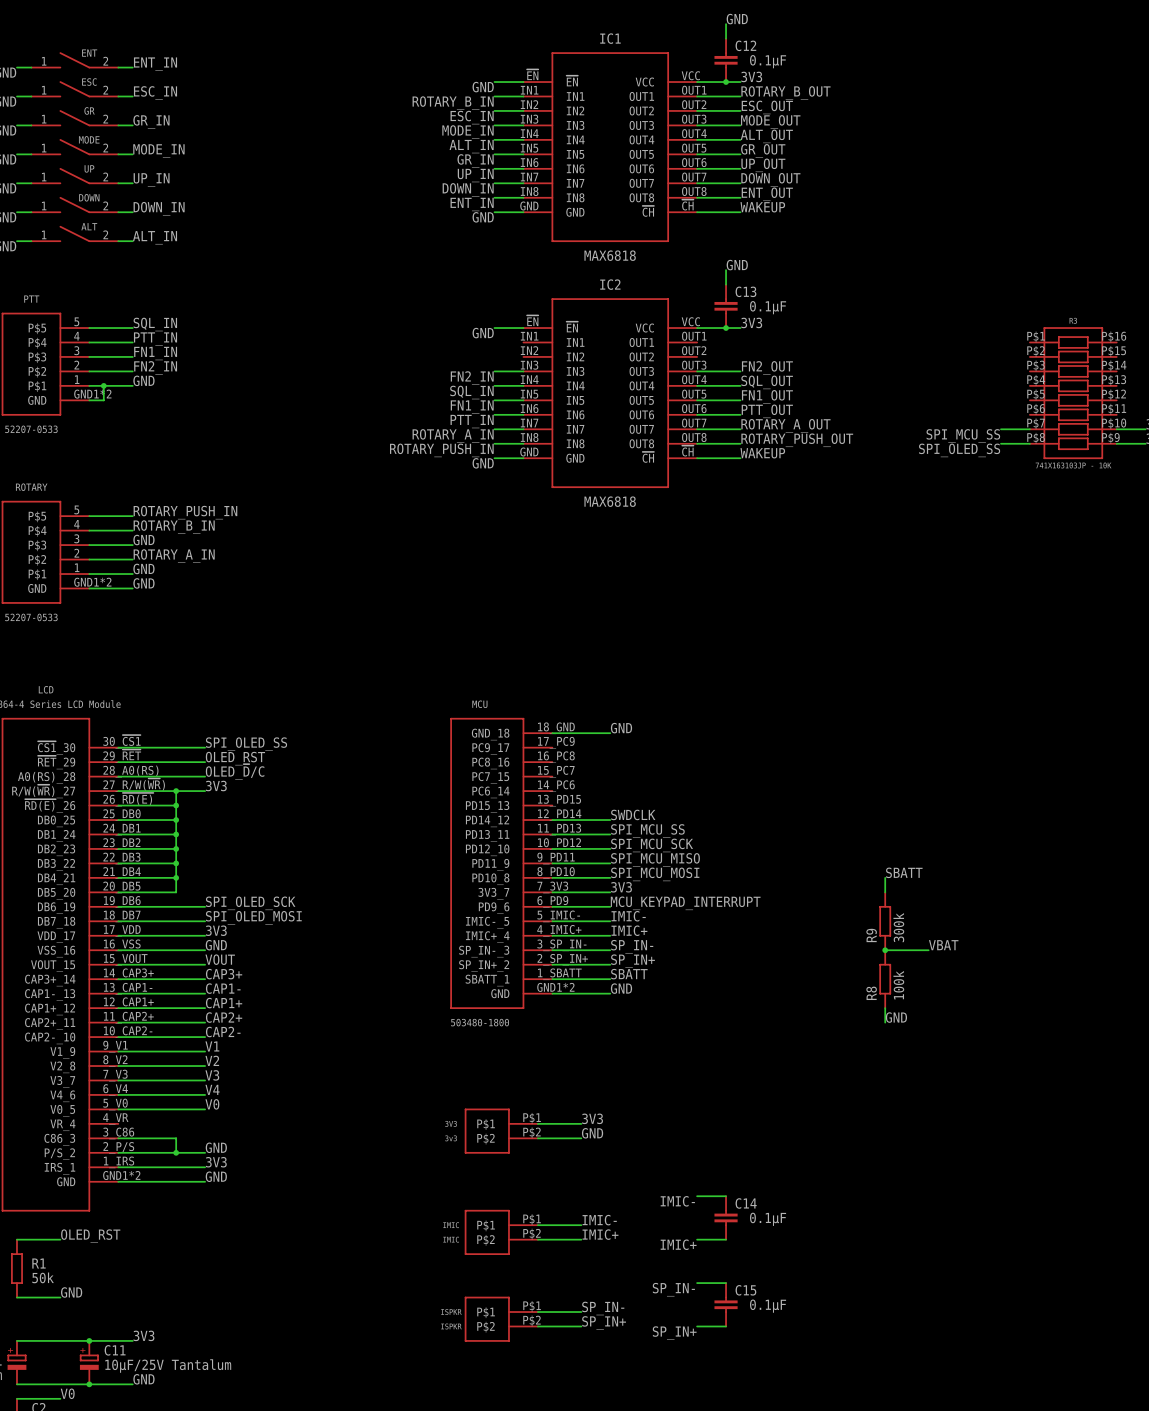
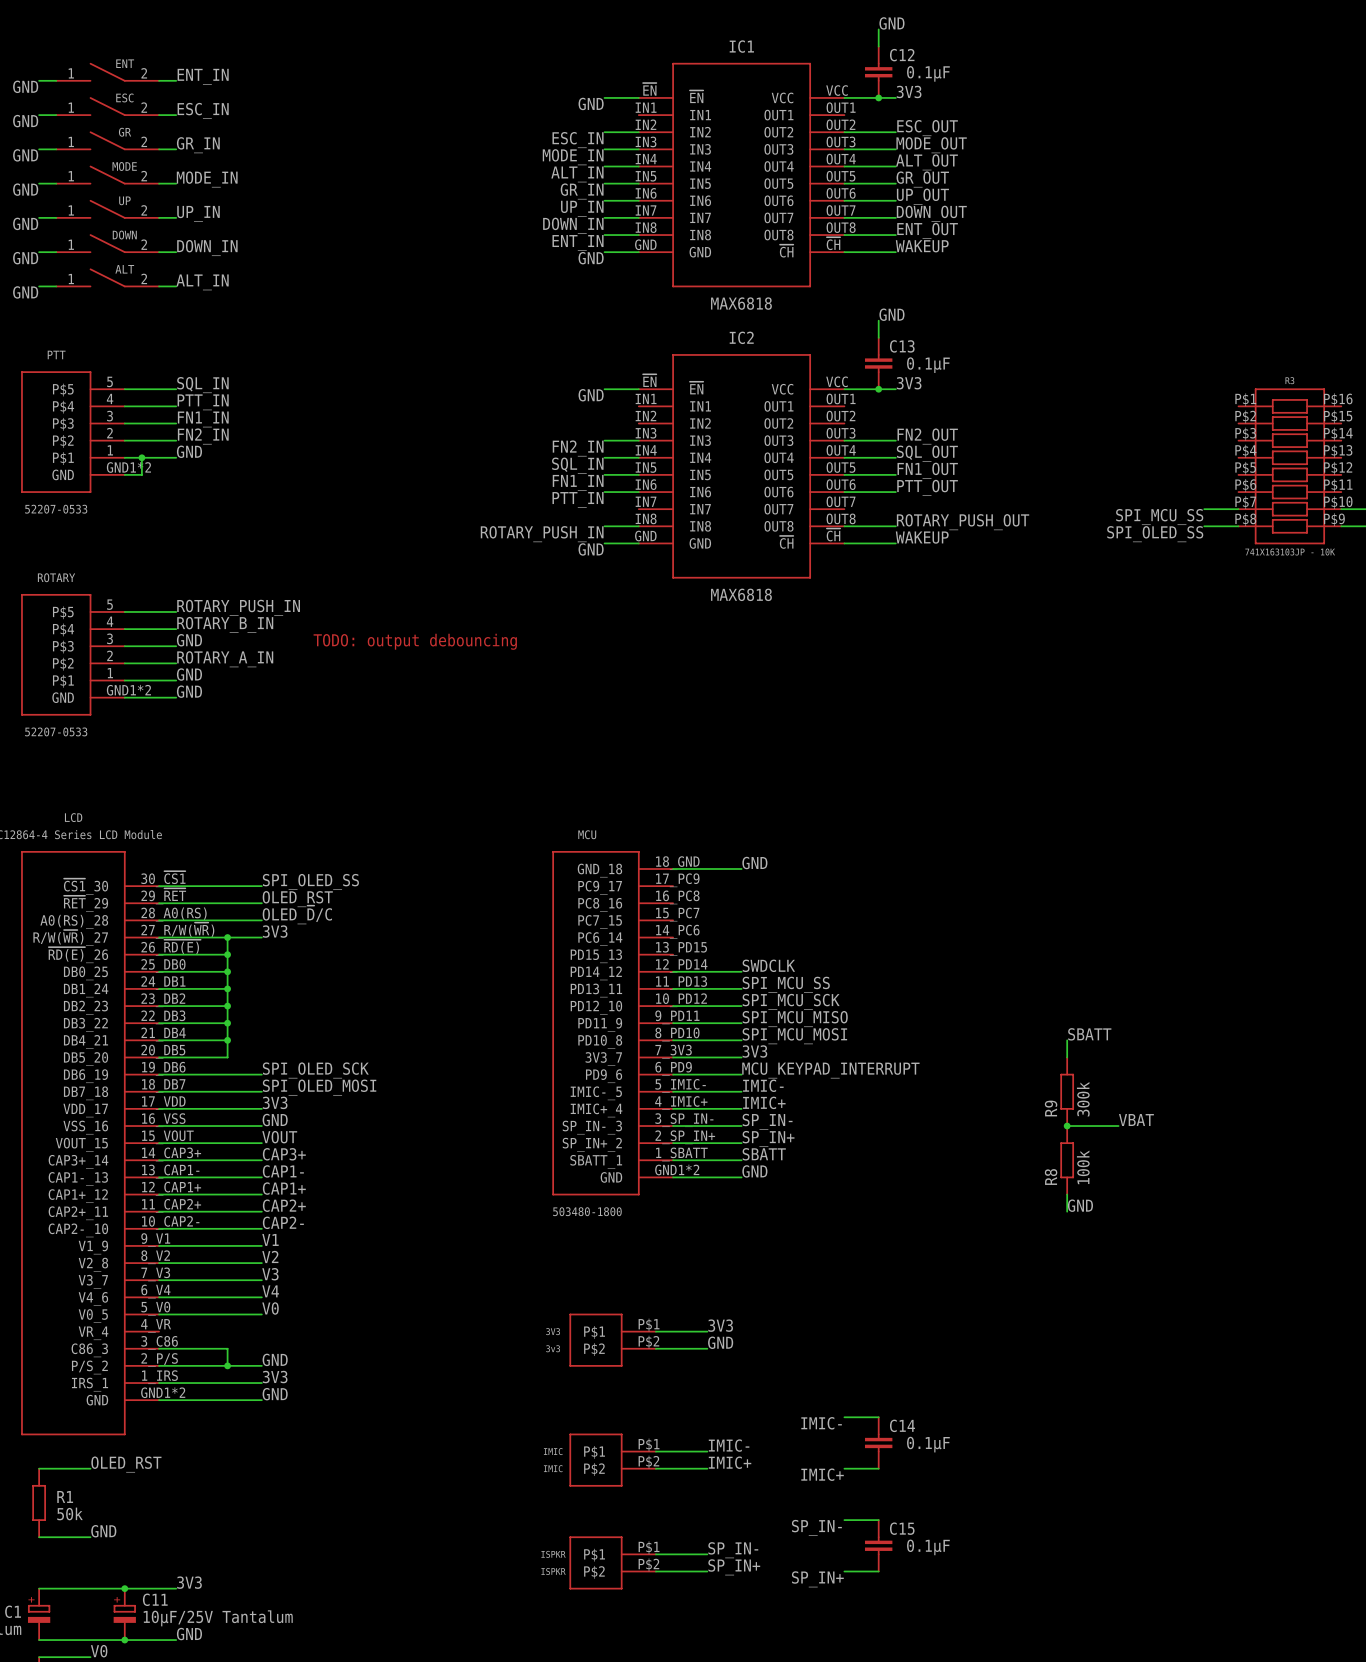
label: ROTARY_B_OUT (785, 92) -> none
wire: (494, 96) (523, 96) -> none
wire: (697, 96) (740, 96) -> none
label: ROTARY_B_IN (453, 103) -> none
label: ROTARY_A_OUT (785, 425) -> none
wire: (494, 429) (523, 429) -> none
wire: (697, 429) (740, 429) -> none
label: ROTARY_A_IN (453, 435) -> none
text: none -> TODO: output debouncing (415, 641)

